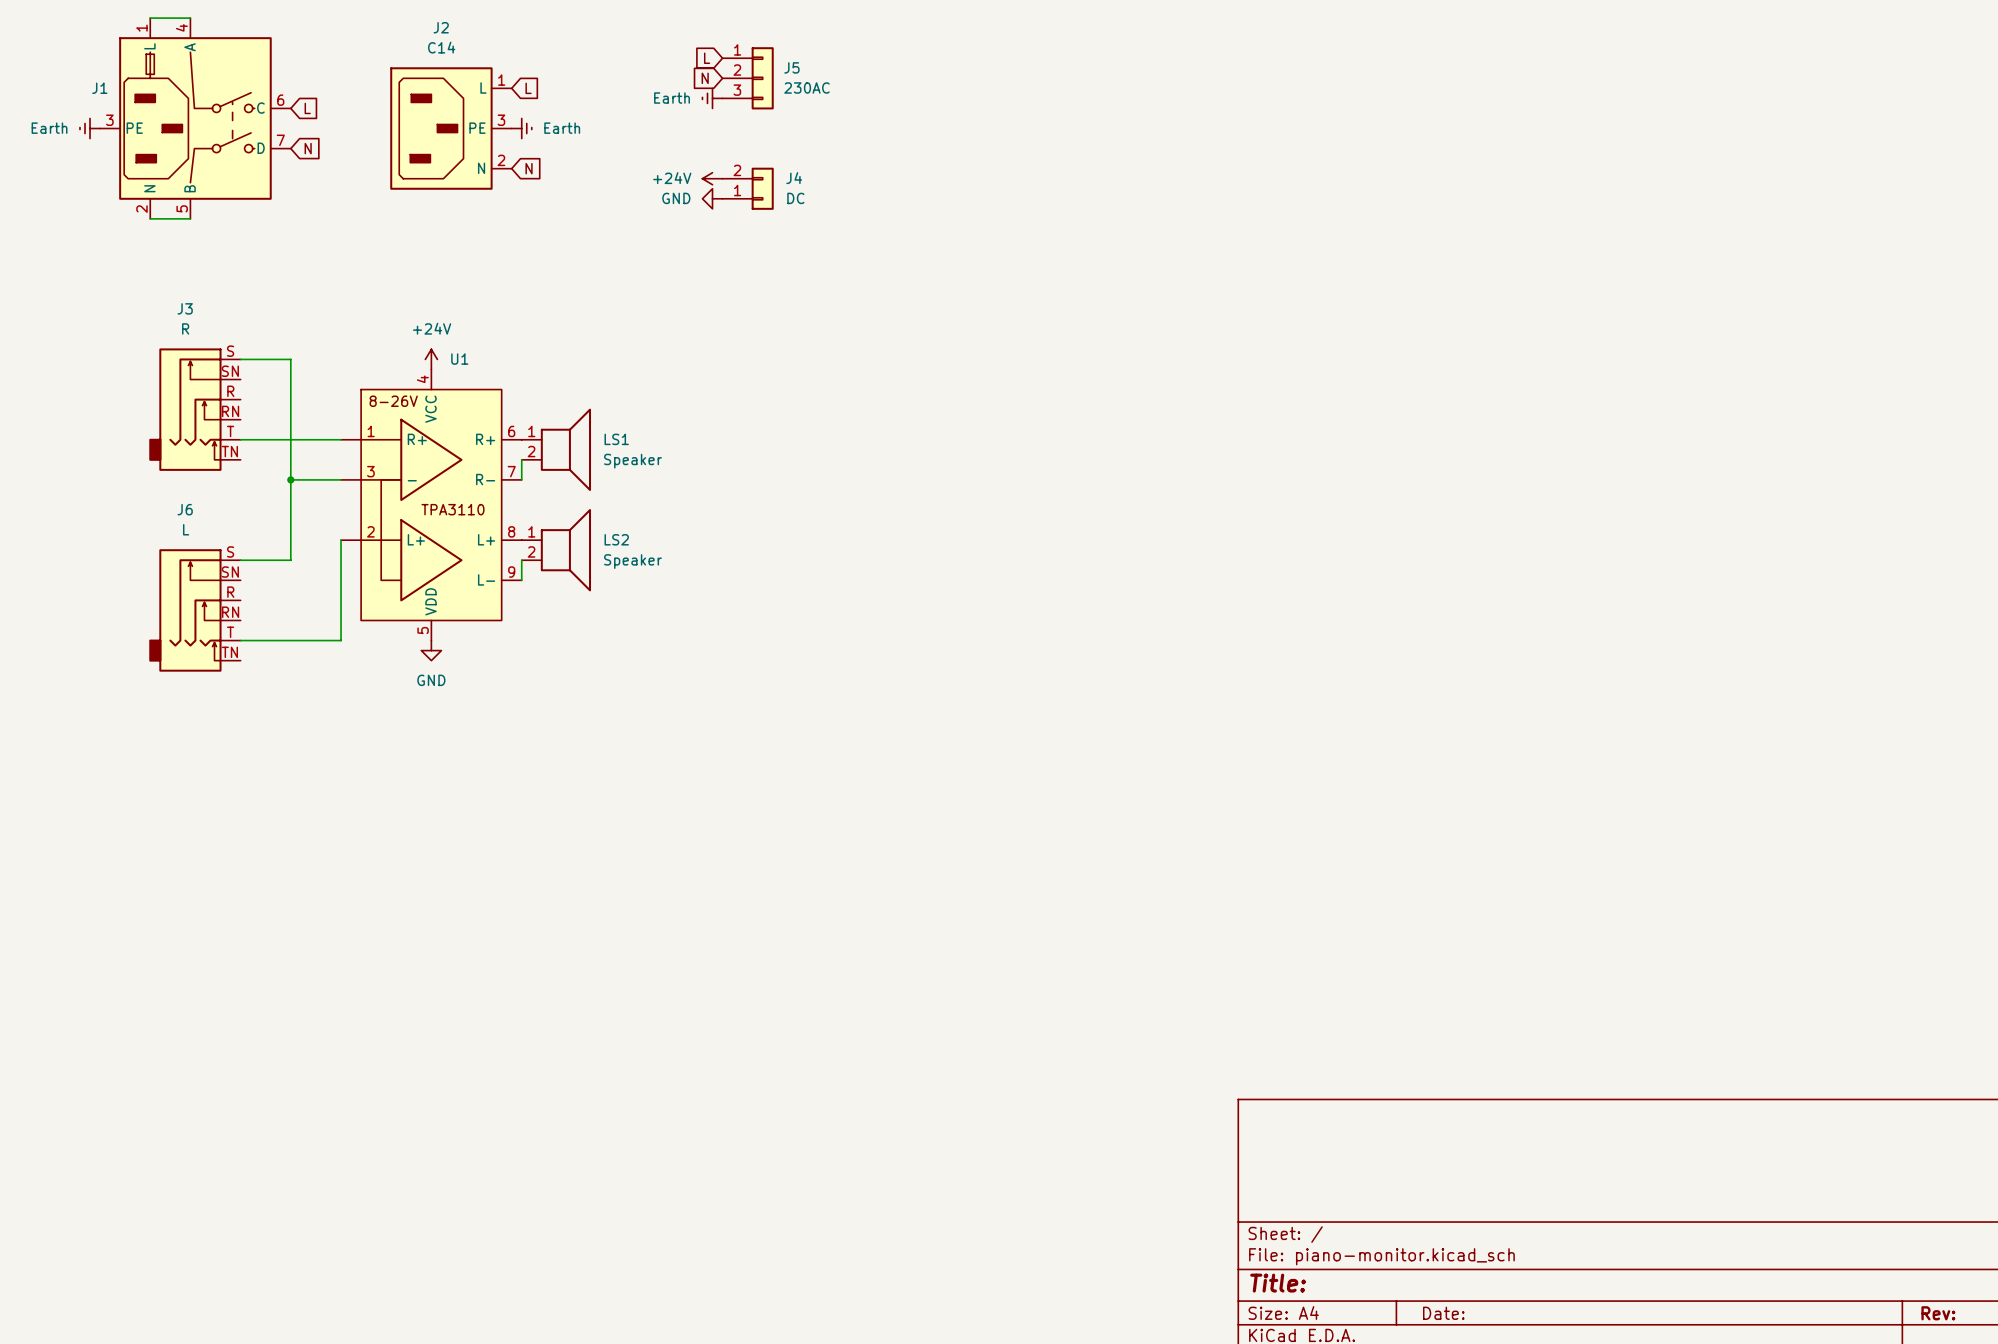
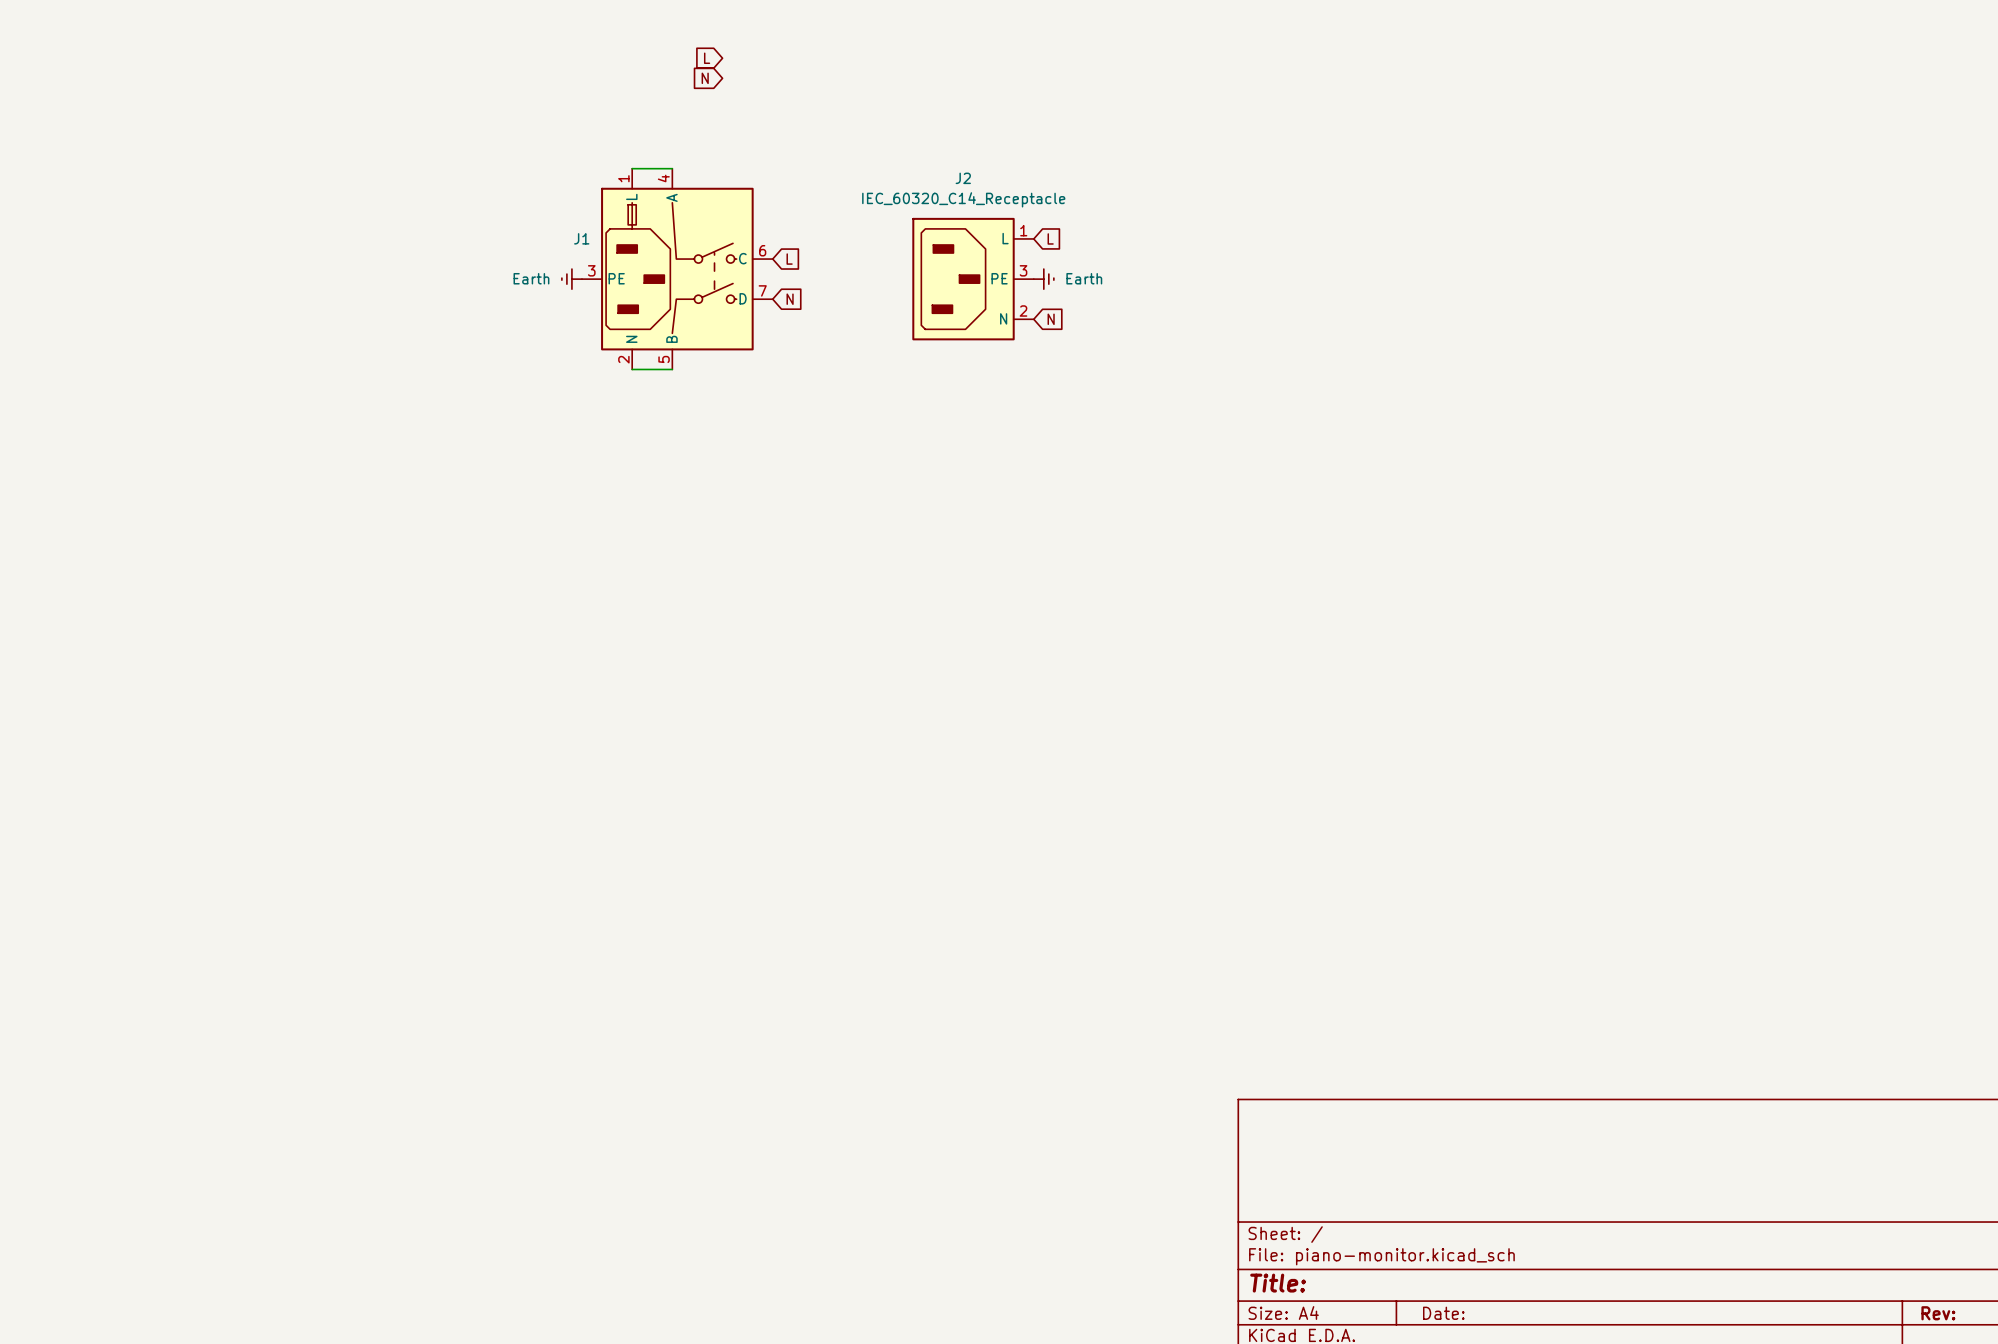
wire: (150, 18) (190, 18) -> none
J2 value: C14 (441, 47) -> IEC_60320_C14_Receptacle (963, 199)
J5: 230AC (748, 78) -> none
global label: L (528, 88) -> none
power symbol: Earth (712, 98) -> none
global label: L (307, 108) -> none
J1 position: (195, 118) -> (677, 269)
power symbol: Earth (90, 128) -> none
J2 position: (450, 128) -> (973, 279)
power symbol: Earth (521, 128) -> none
global label: N (308, 148) -> none
global label: N (529, 168) -> none
wire: none -> (632, 168) (672, 168)
power symbol: +24V (712, 178) -> none
J4: DC (748, 188) -> none
power symbol: GND (712, 198) -> none
wire: (150, 218) (190, 218) -> none
global label: none -> L (1050, 238)
global label: none -> L (789, 259)
power symbol: none -> Earth (571, 279)
power symbol: none -> Earth (1043, 279)
global label: none -> N (790, 299)
global label: none -> N (1051, 319)
wire: (240, 359) (290, 359) (290, 560) (240, 560) -> none
power symbol: +24V (431, 359) -> none
wire: none -> (632, 369) (672, 369)
J3: R (194, 409) -> none
wire: (240, 439) (341, 439) -> none
LS1: Speaker (556, 449) -> none
wire: (521, 459) (521, 479) -> none
wire: (290, 479) (341, 479) -> none
junction: (290, 479) -> none
U1: (431, 505) -> none
wire: (341, 540) (341, 640) (240, 640) -> none
LS2: Speaker (556, 550) -> none
wire: (521, 560) (521, 580) -> none
J6: L (194, 610) -> none
power symbol: GND (431, 650) -> none

